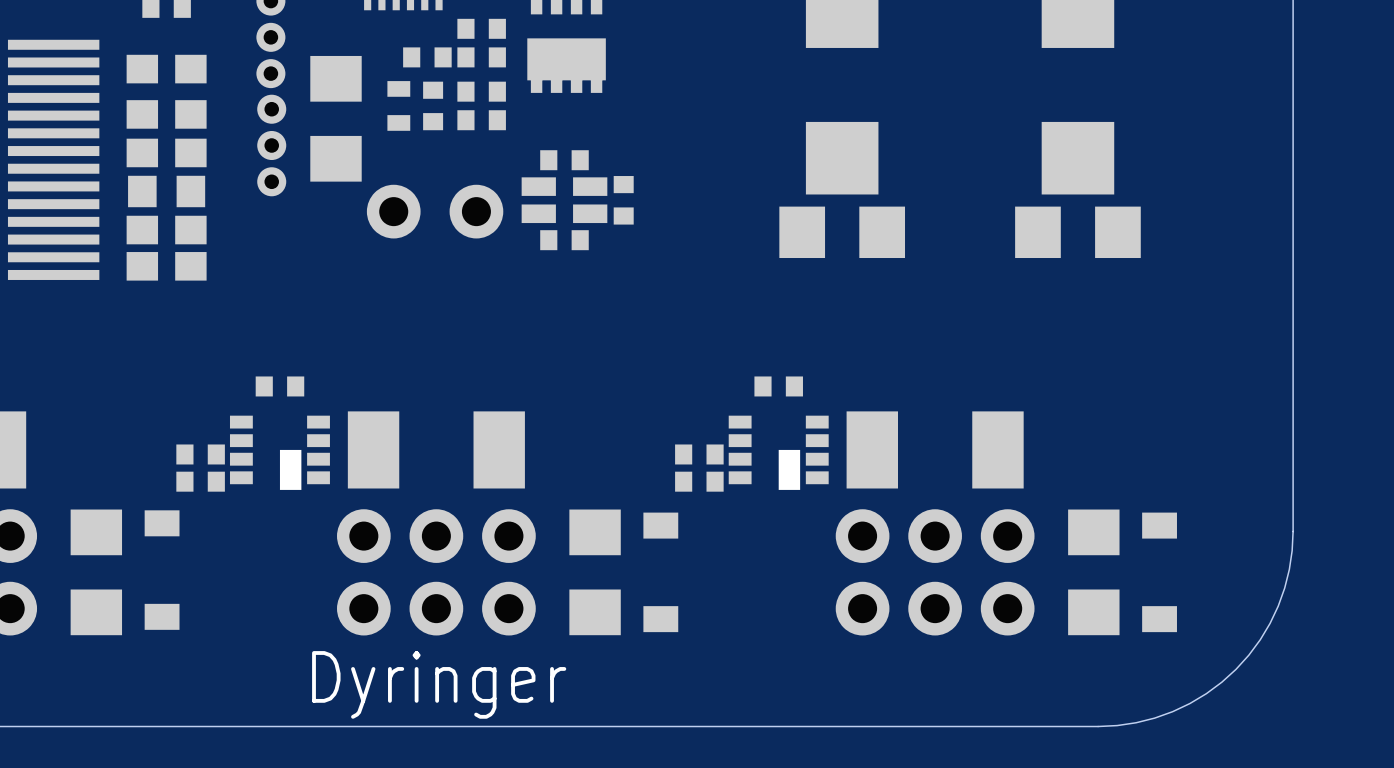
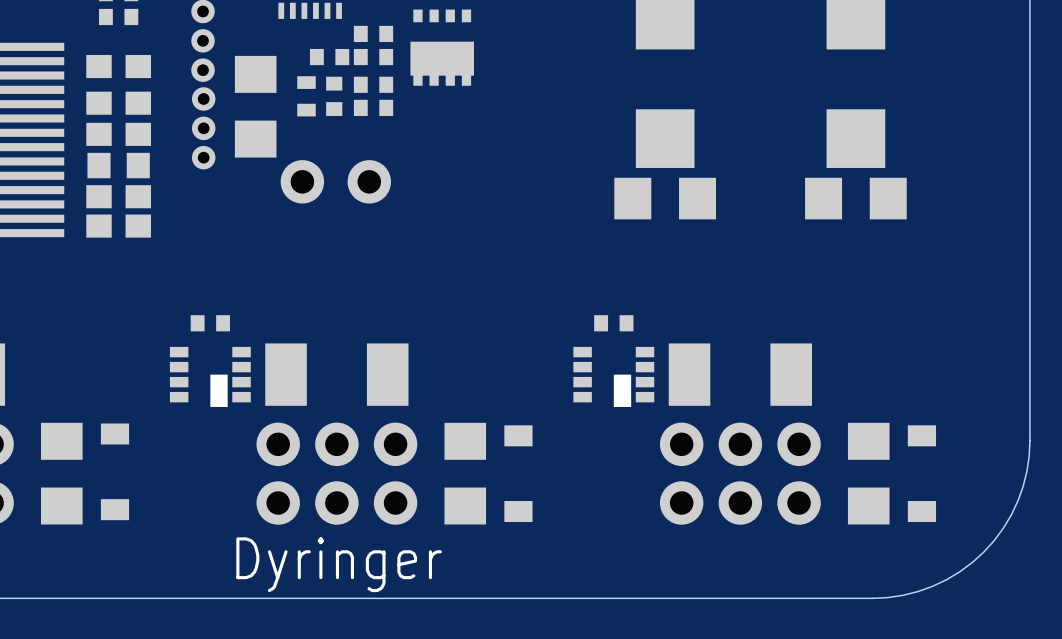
part: (564, 160) -> none
part: (564, 200) -> none
part: (623, 200) -> none
part: (564, 240) -> none
part: (200, 454) -> none
part: (699, 454) -> none
part: (200, 481) -> none
part: (699, 481) -> none

